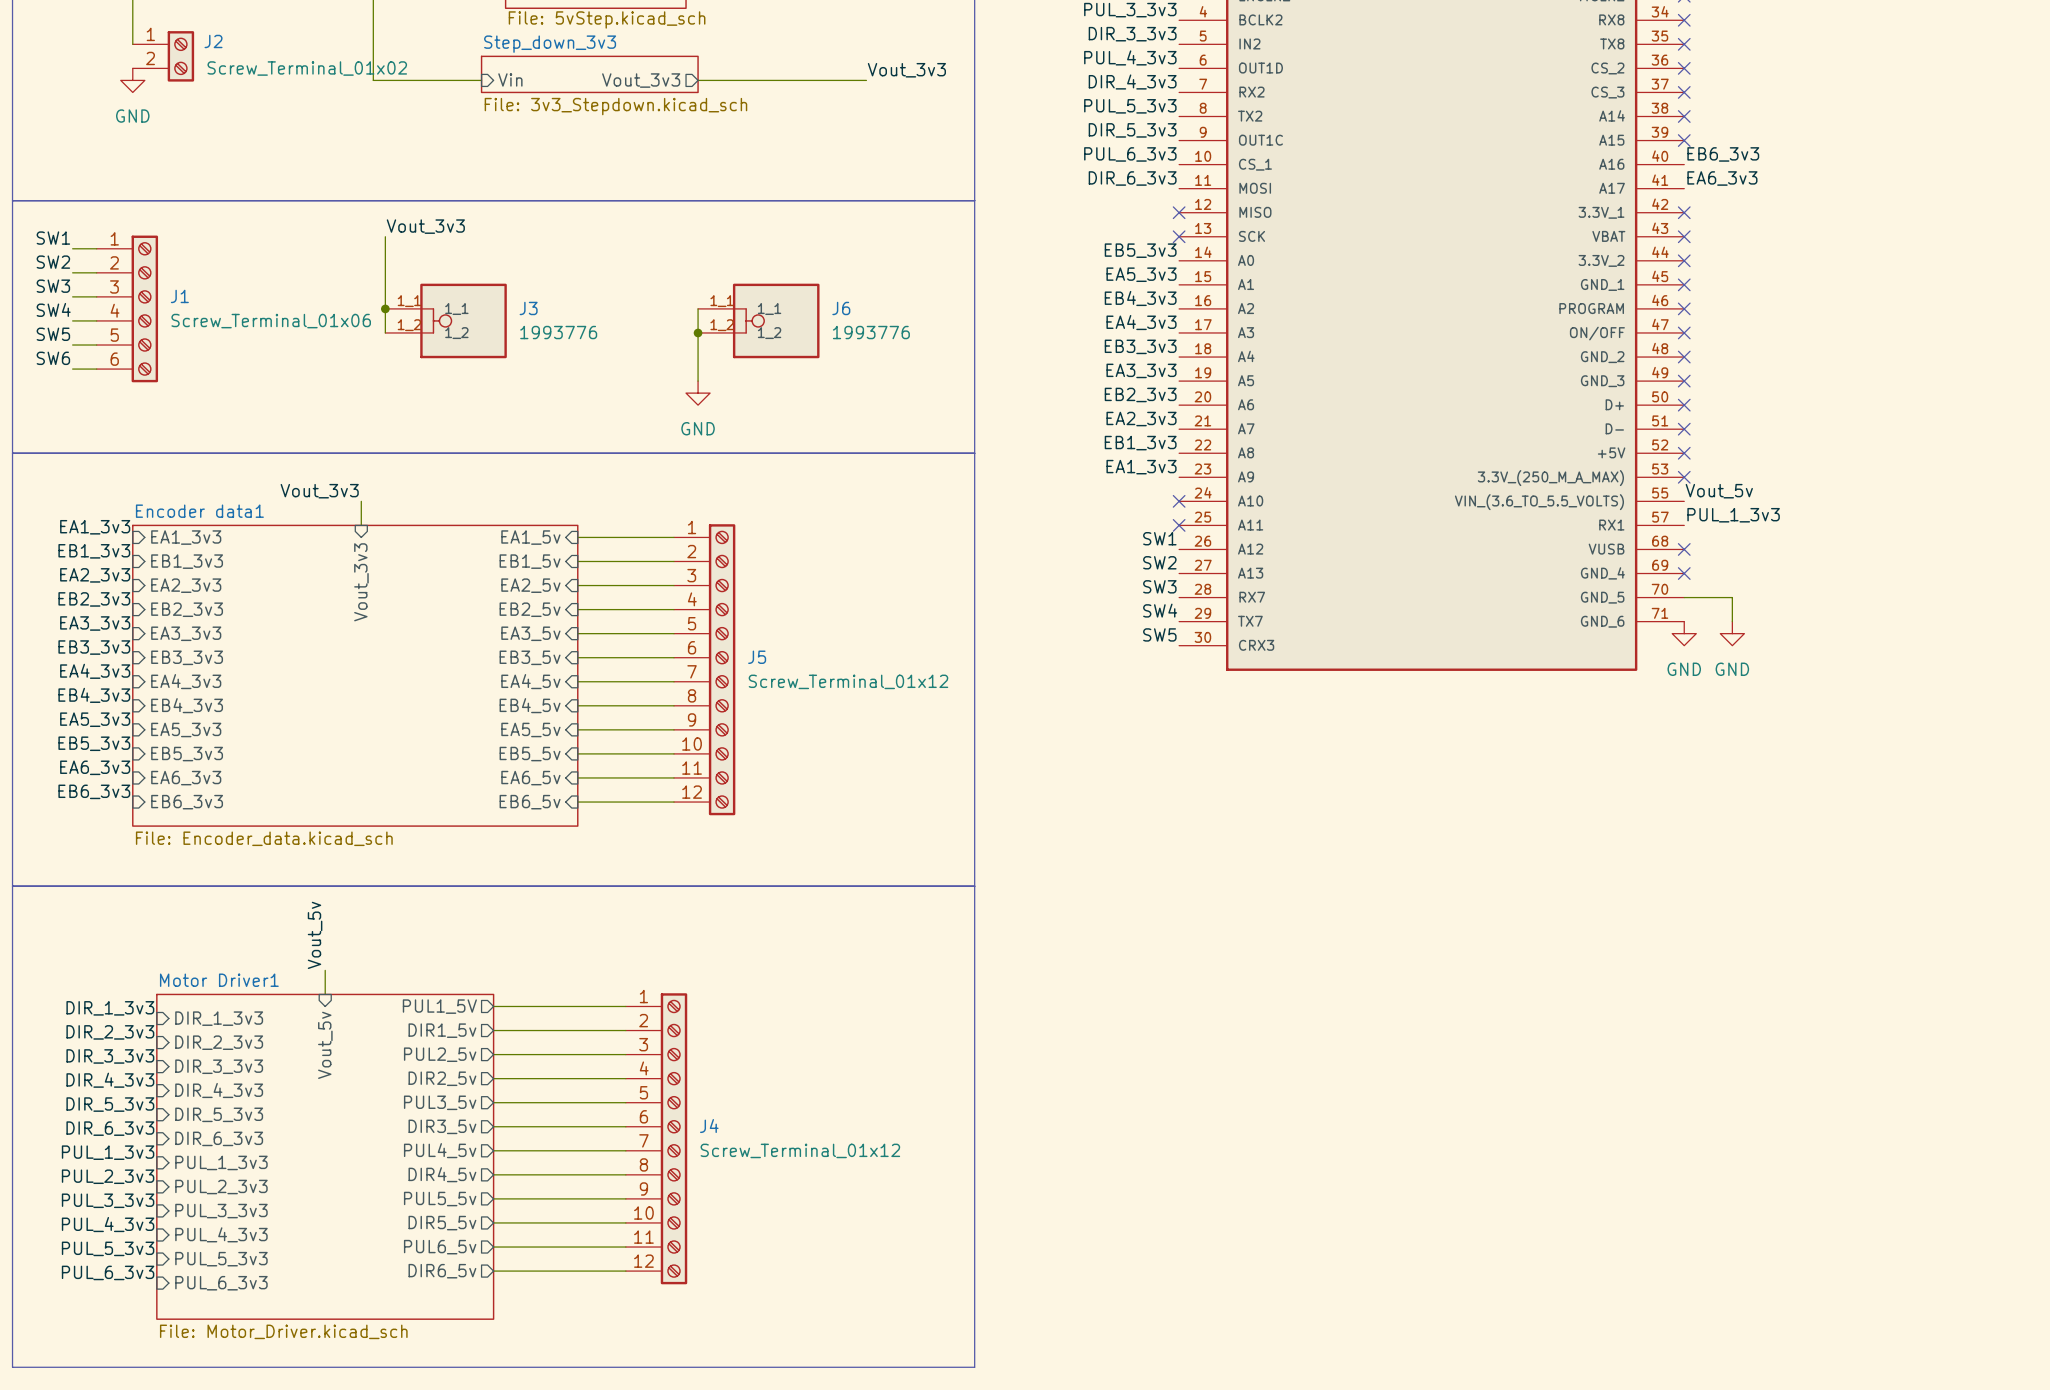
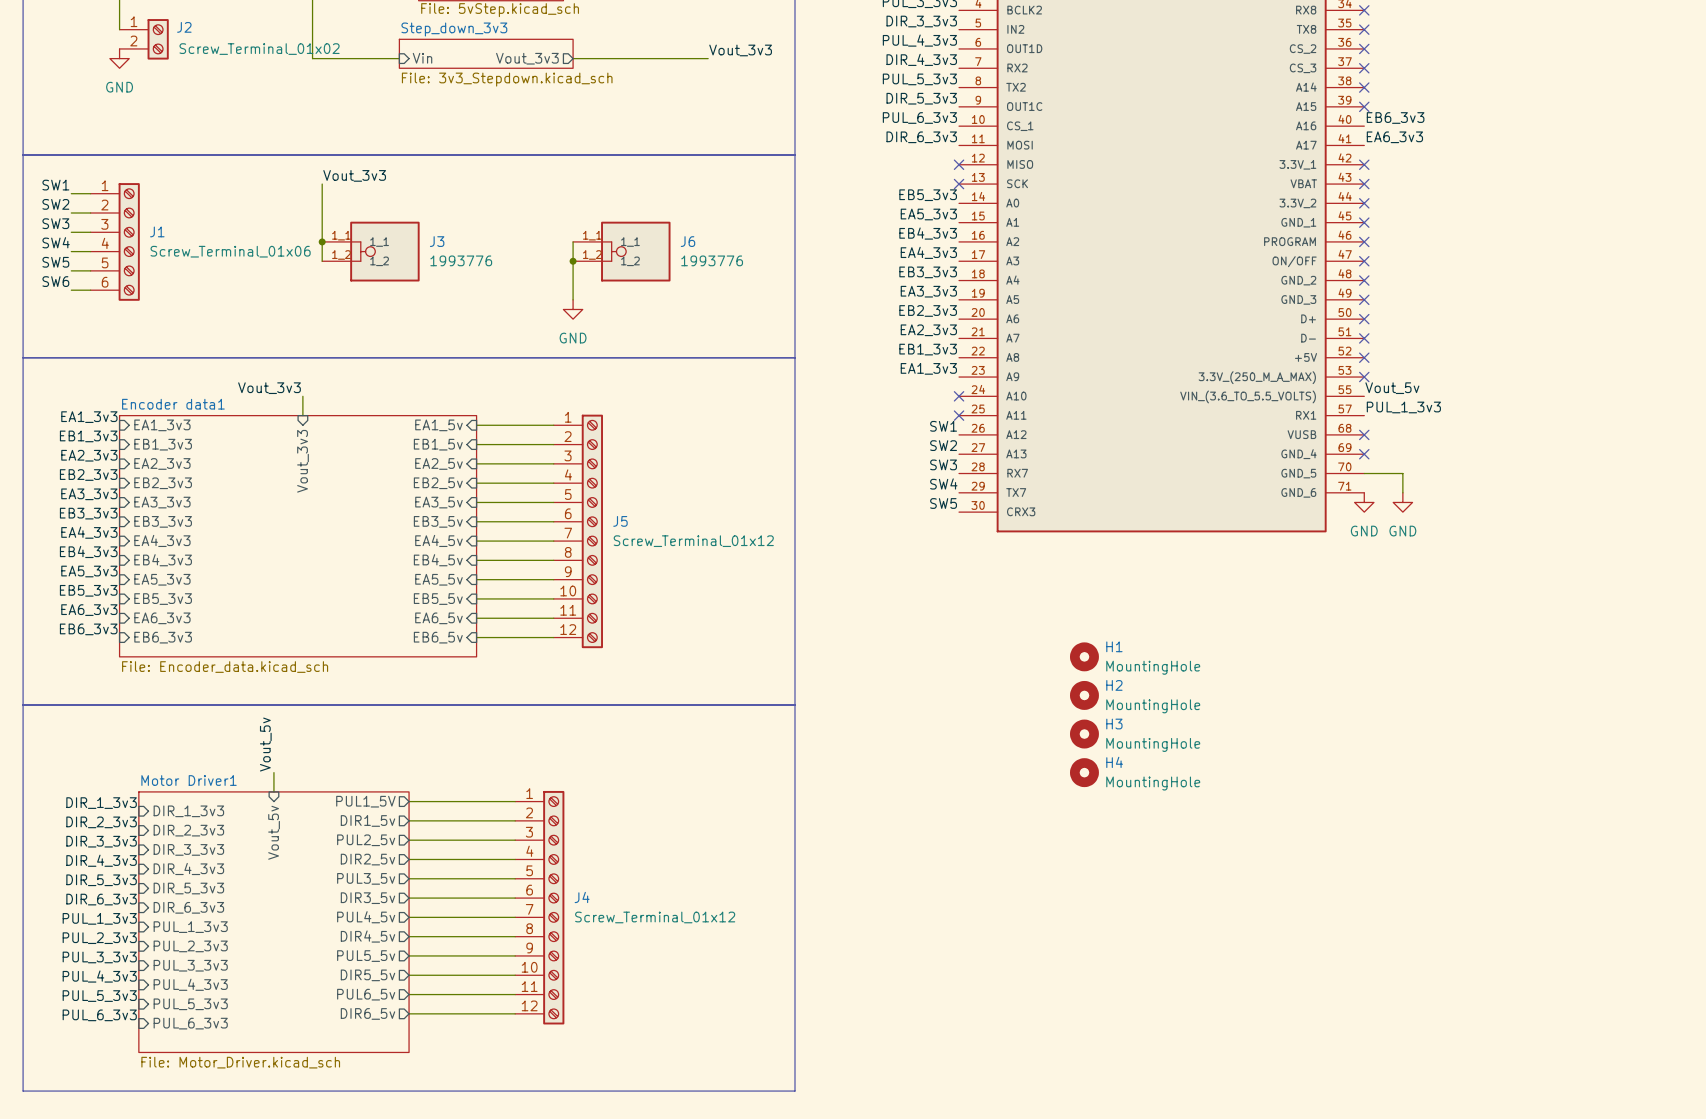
H1: none -> MountingHole (1084, 656)
H2: none -> MountingHole (1084, 695)
H3: none -> MountingHole (1084, 734)
H4: none -> MountingHole (1084, 772)

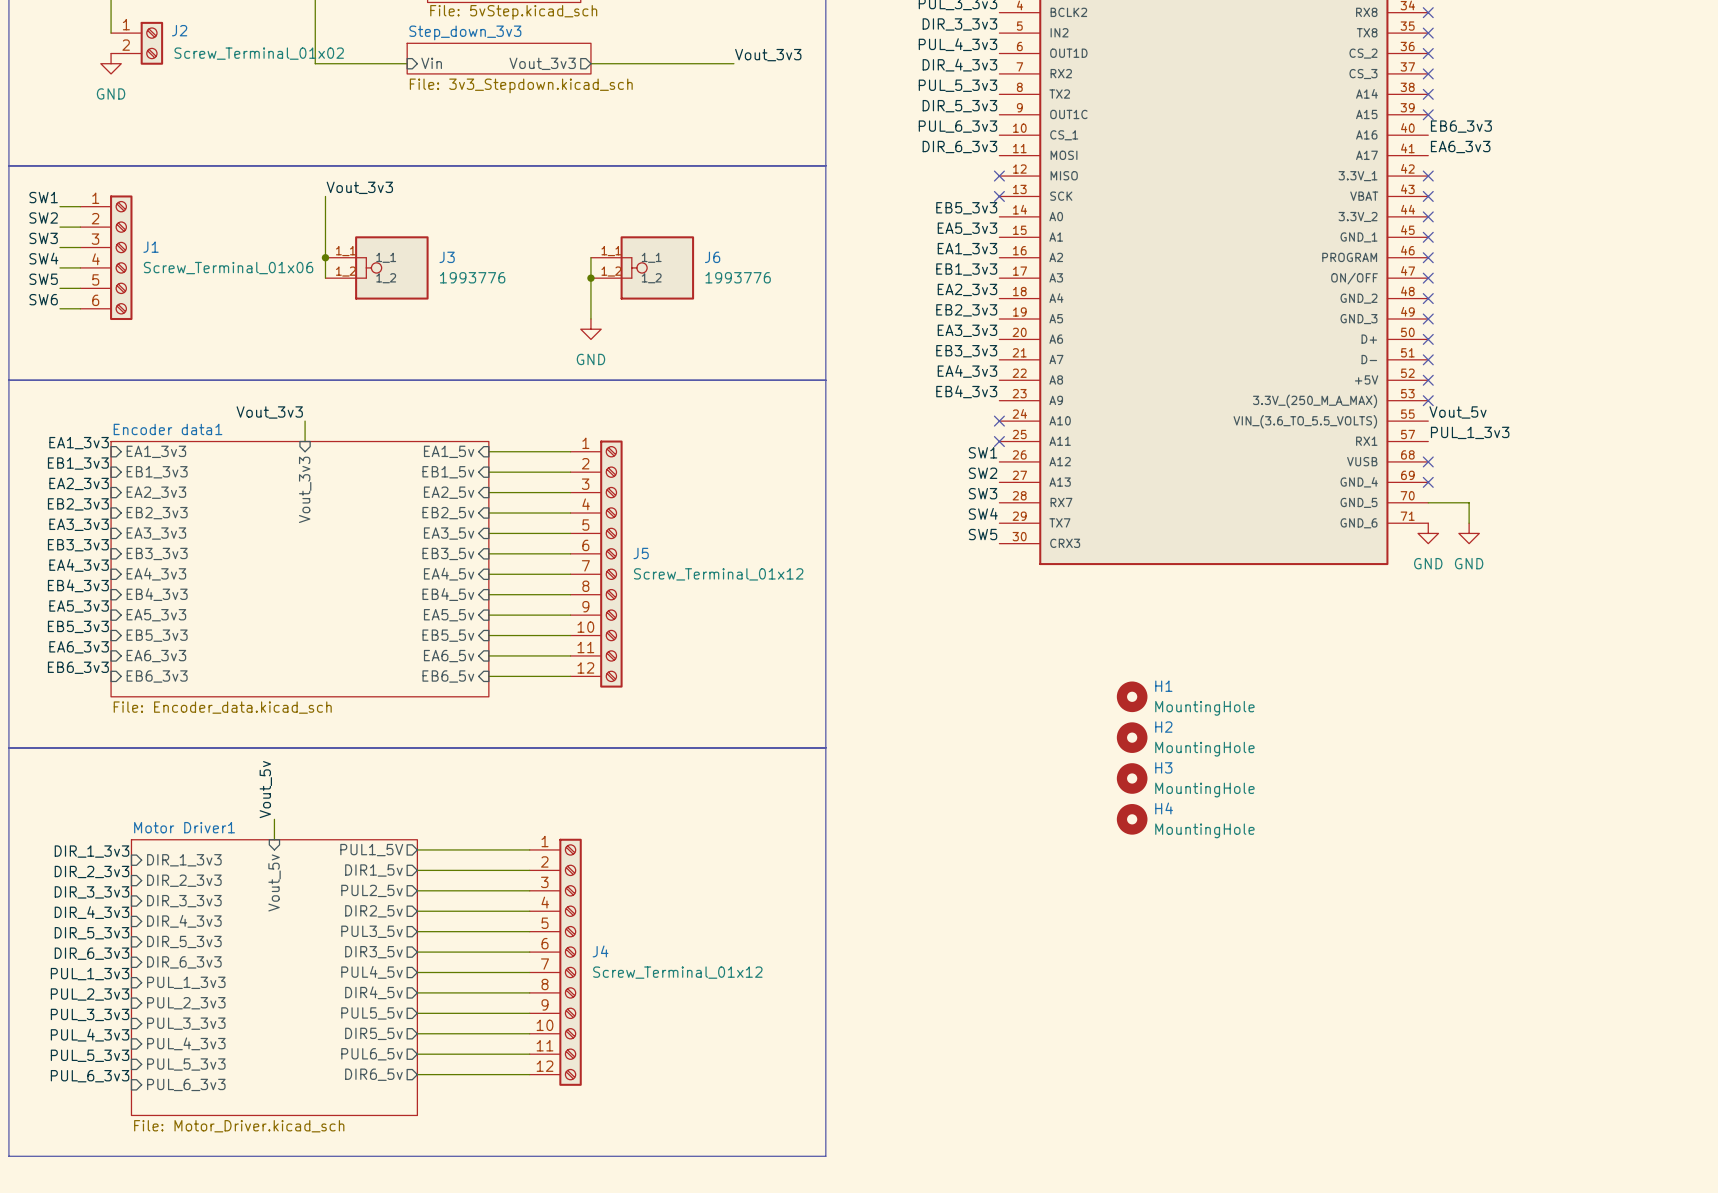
label: EB4_3v3 (928, 233) -> EA1_3v3 (967, 249)
label: EA4_3v3 (928, 252) -> EB1_3v3 (966, 269)
label: EB3_3v3 (928, 272) -> EA2_3v3 (967, 289)
label: EA3_3v3 (928, 291) -> EB2_3v3 (966, 310)
label: EB2_3v3 (928, 310) -> EA3_3v3 (967, 330)
label: EA2_3v3 (928, 330) -> EB3_3v3 (966, 351)
label: EB1_3v3 (928, 349) -> EA4_3v3 (967, 371)
label: EA1_3v3 (928, 368) -> EB4_3v3 (966, 391)

